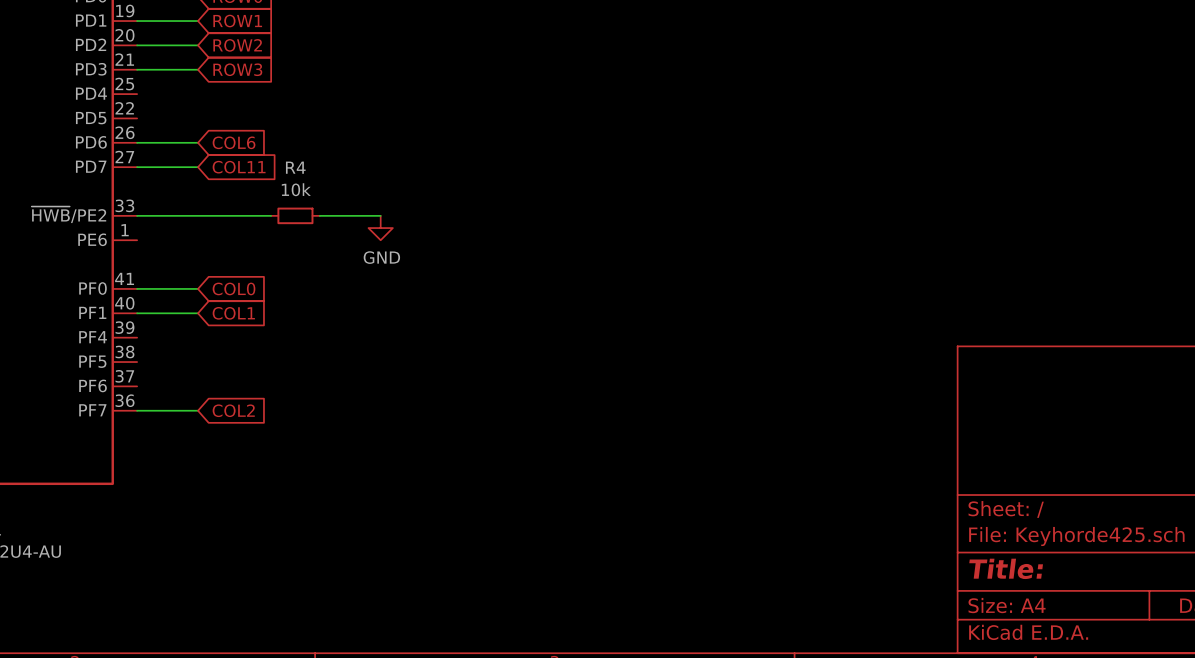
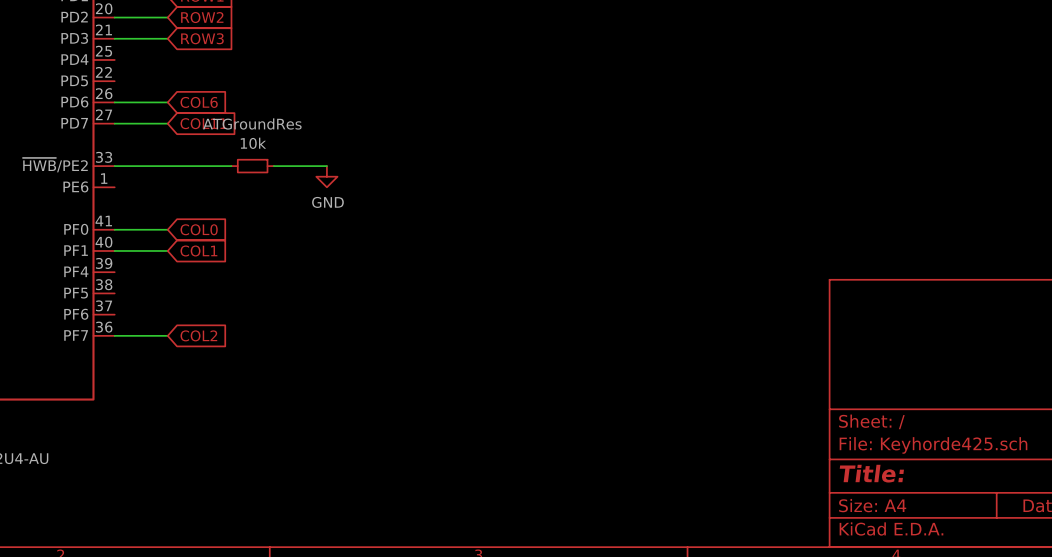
R4 name: R4 (295, 167) -> ATGroundRes (252, 123)

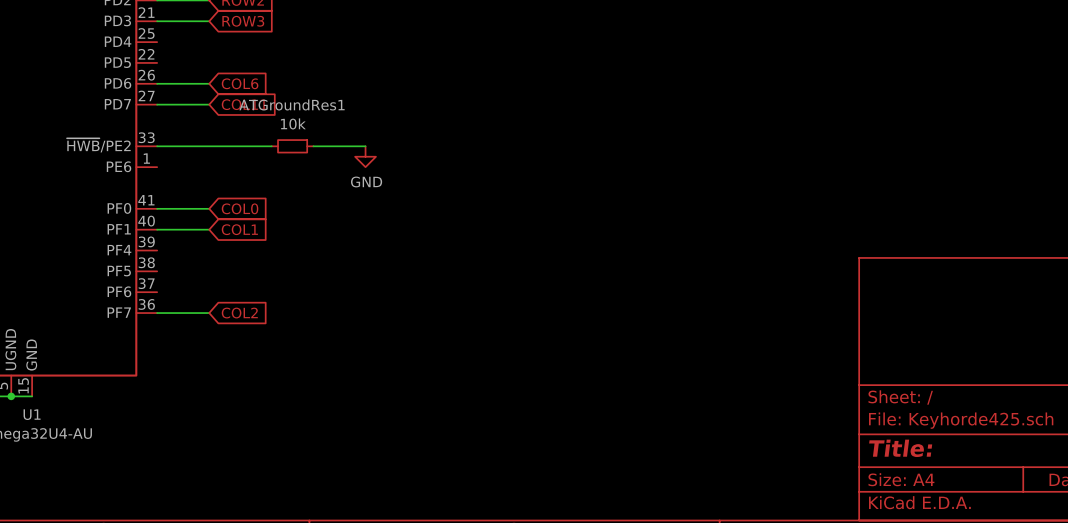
ATGroundRes name: ATGroundRes (252, 123) -> ATGroundRes1 (292, 104)

